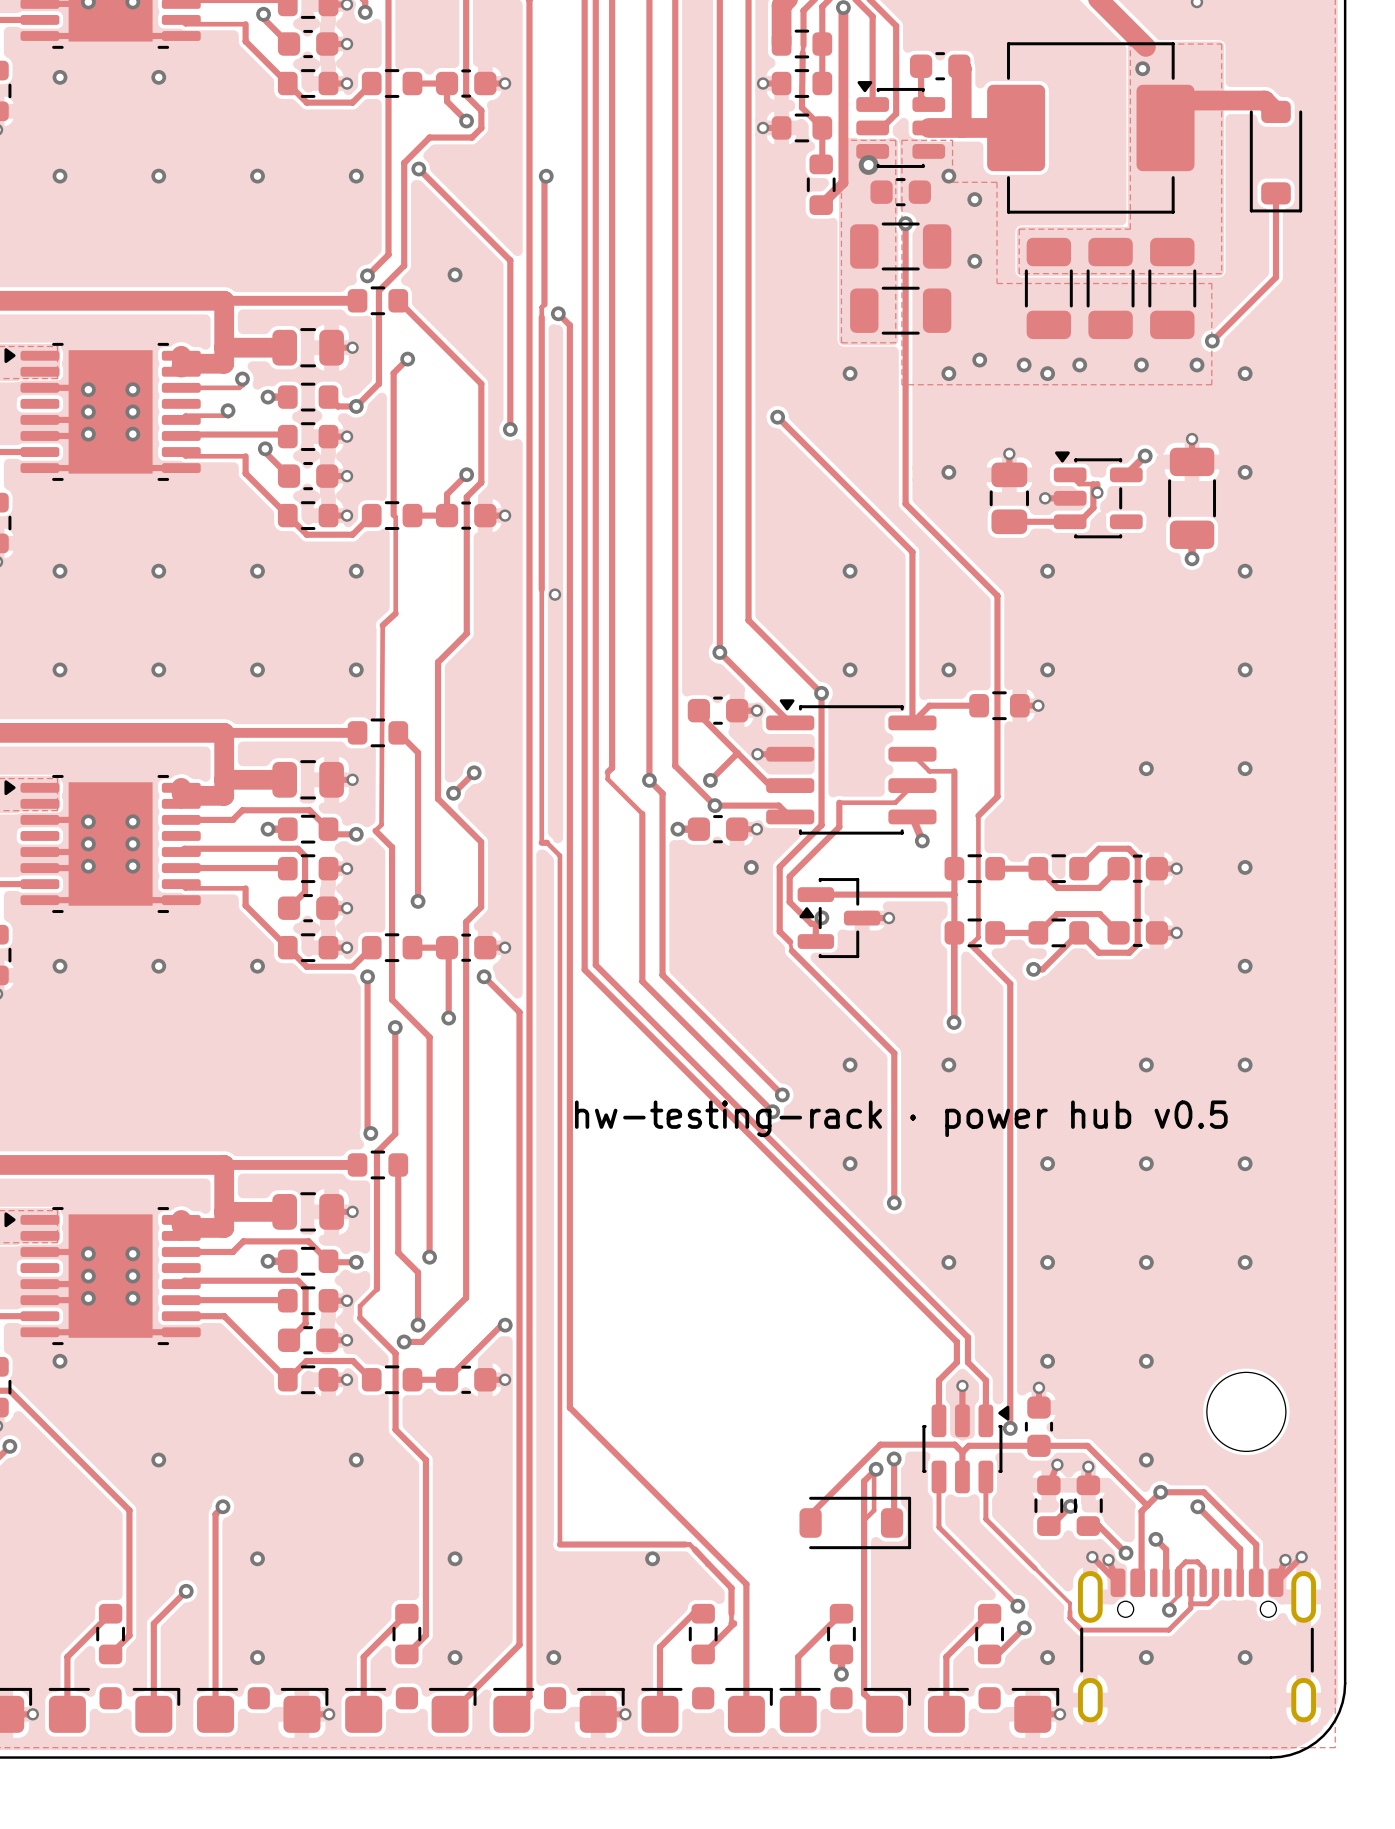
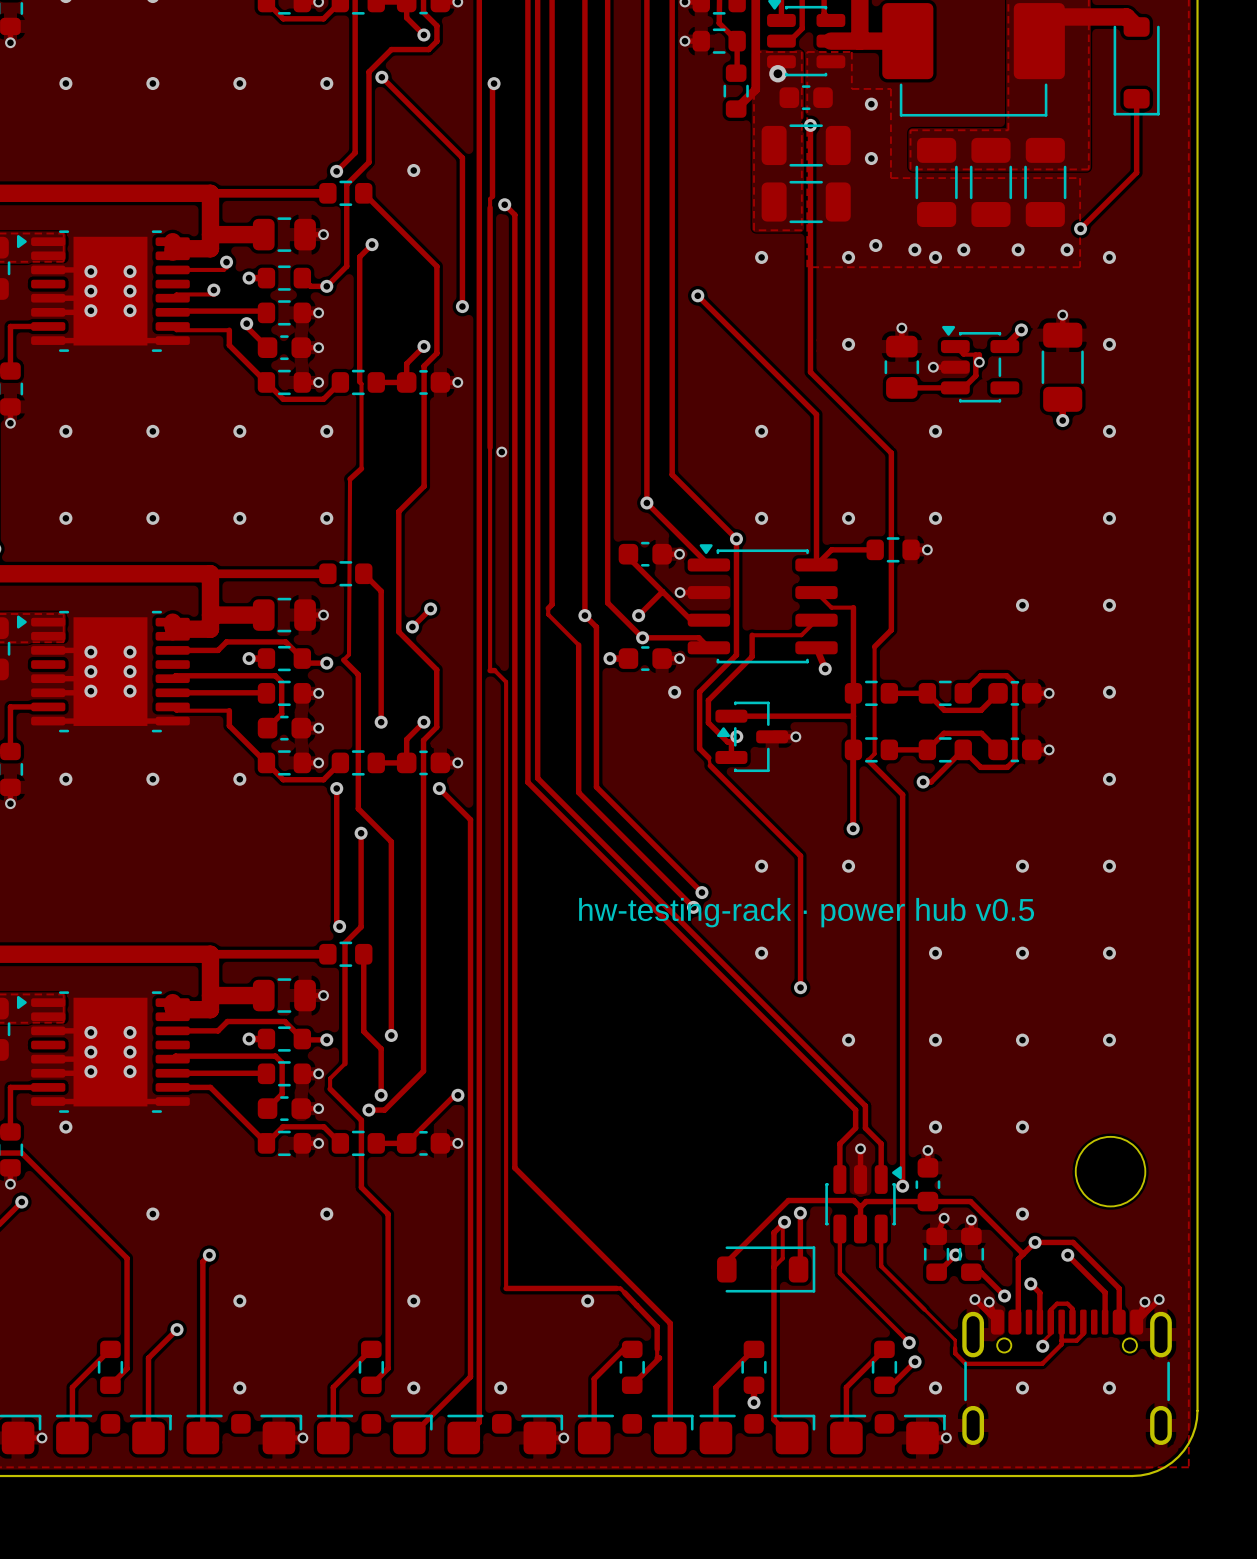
via: (948, 176) -> none
track: none -> (423, 722) (406, 739) (406, 762)
track: (448, 949) (448, 1018) -> none
via position: (448, 1018) -> (423, 722)

